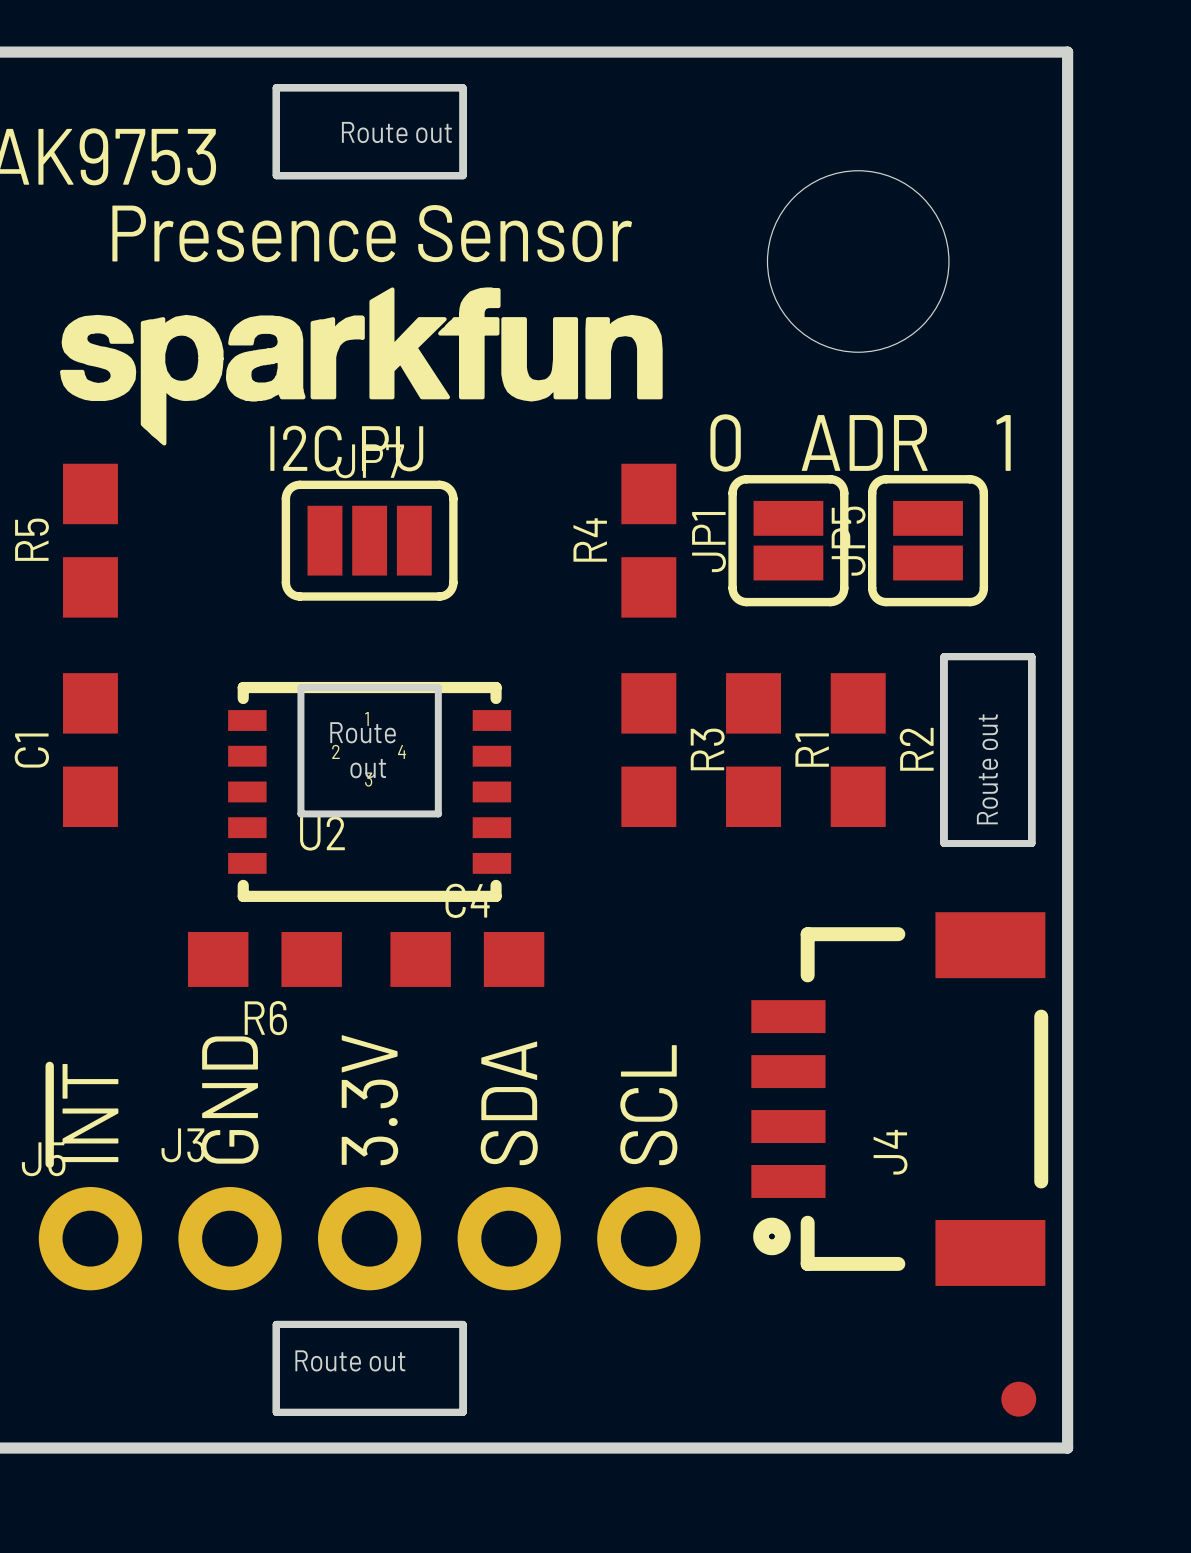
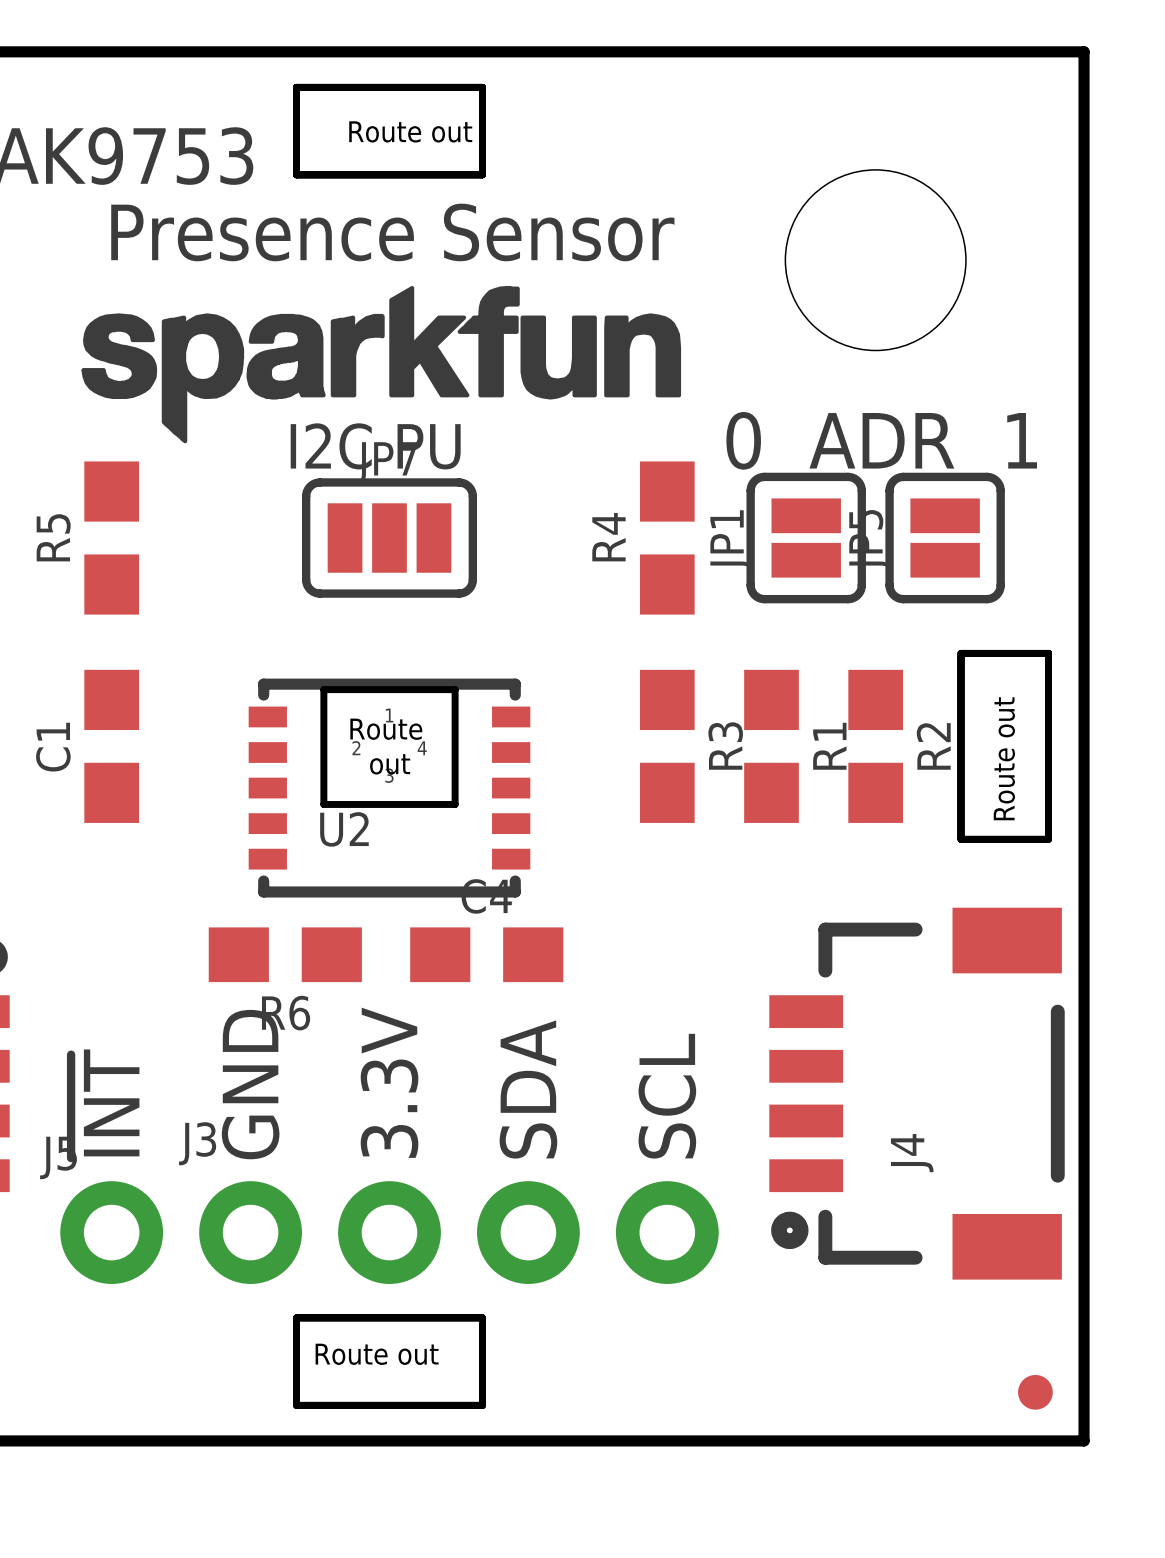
U2 footprint: [228, 681, 512, 902] -> [248, 678, 531, 898]

